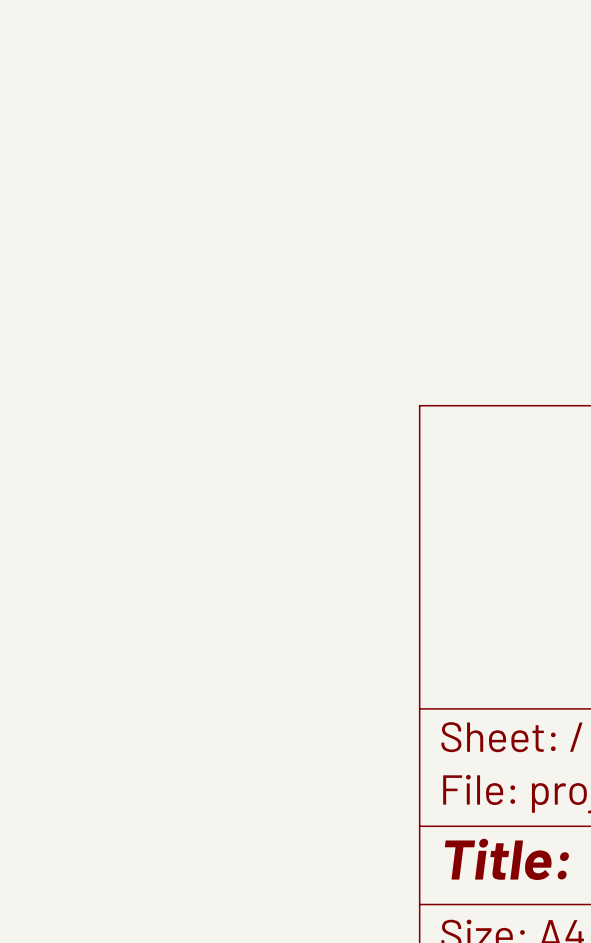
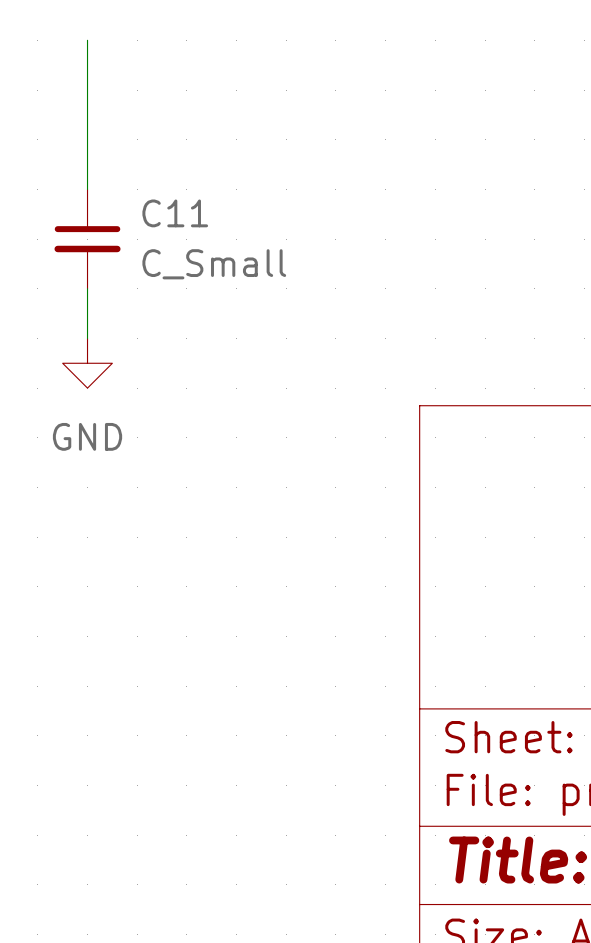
wire: none -> (87, 40) (87, 189)
C11: none -> C_Small (87, 239)
wire: none -> (87, 288) (87, 338)
power symbol: none -> GND (87, 363)

